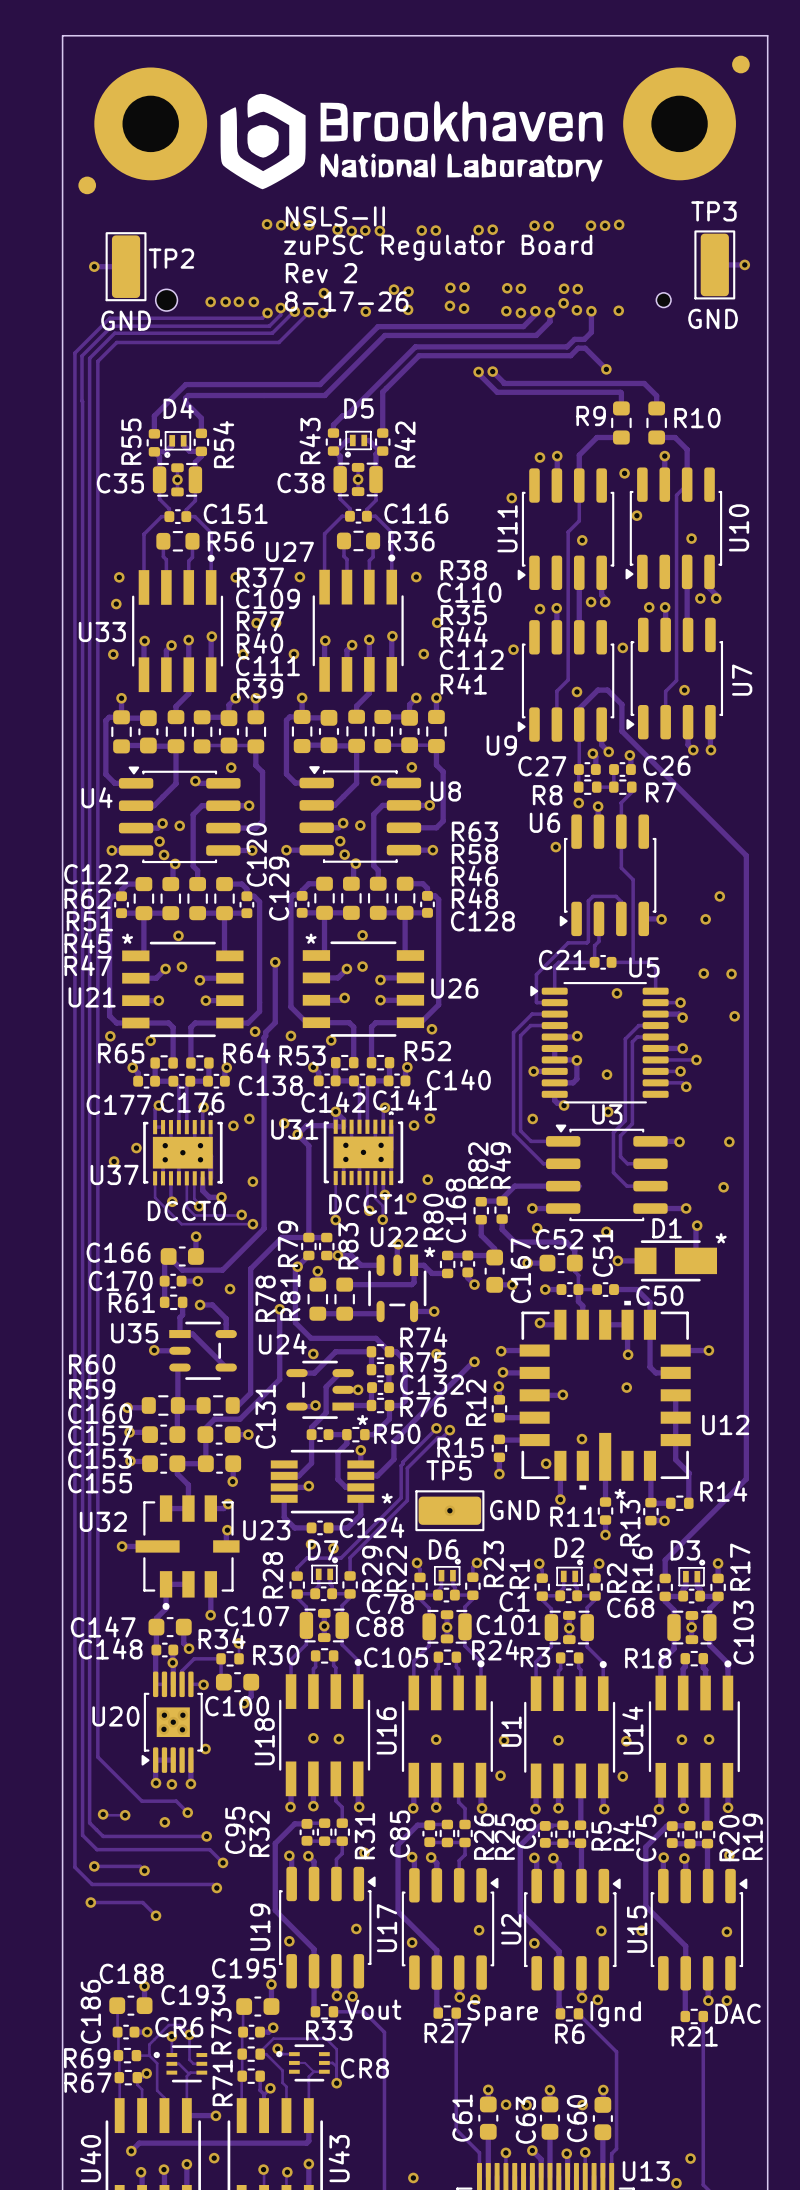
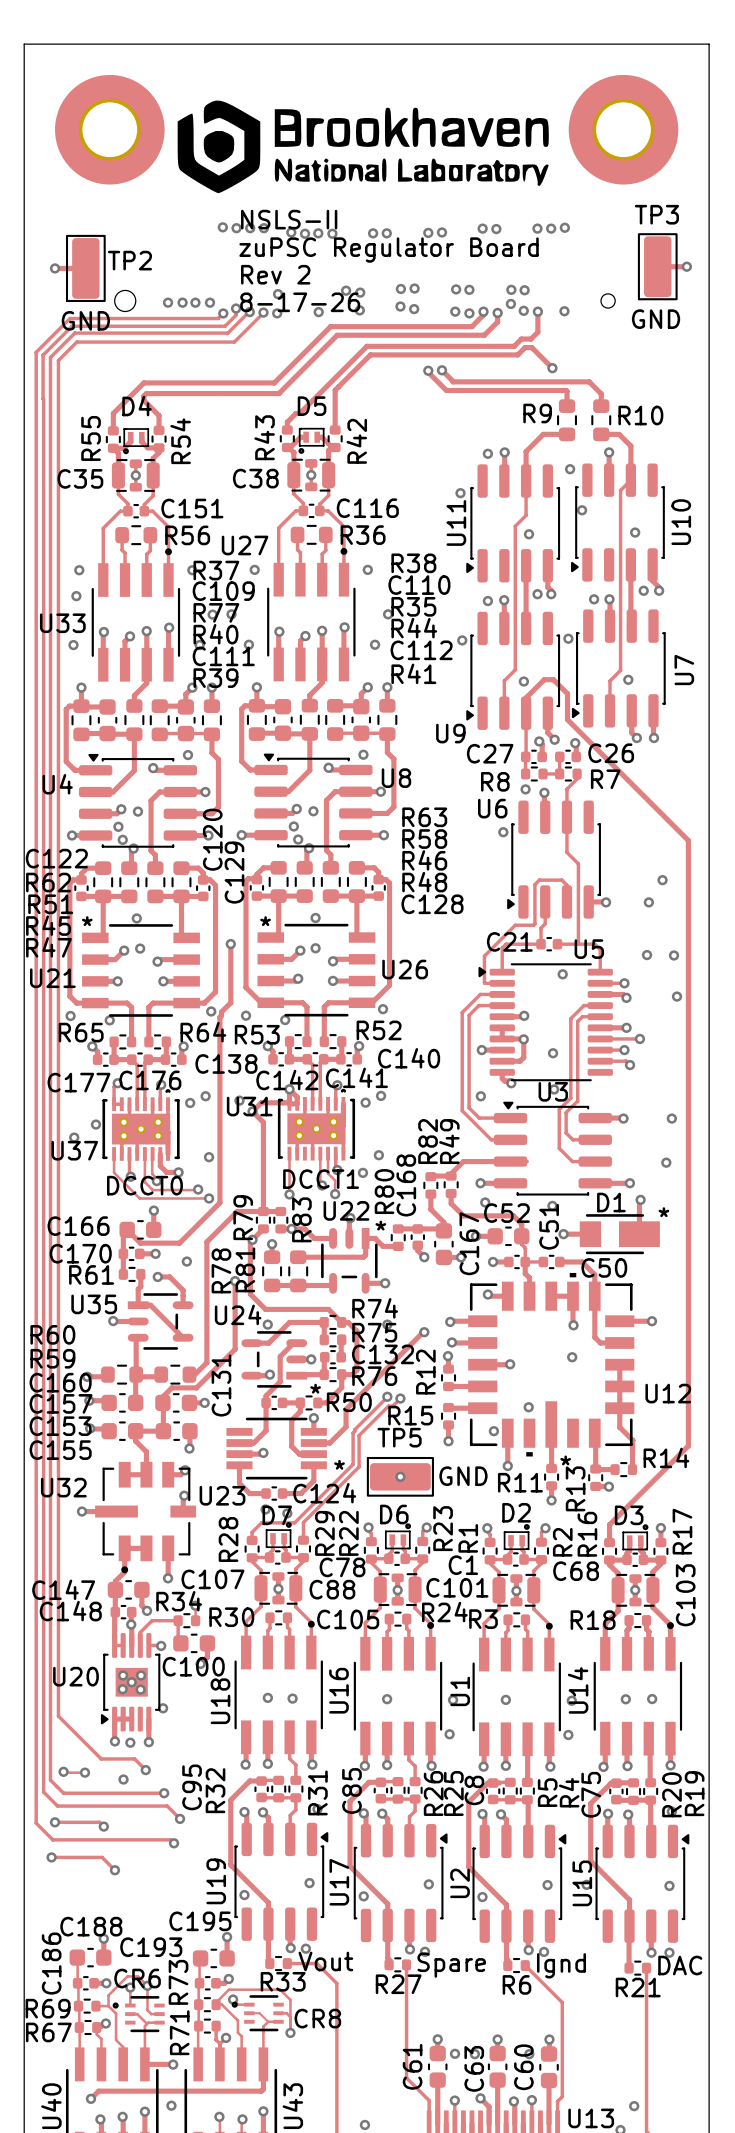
part: (740, 64) -> none
part: (87, 185) -> none

